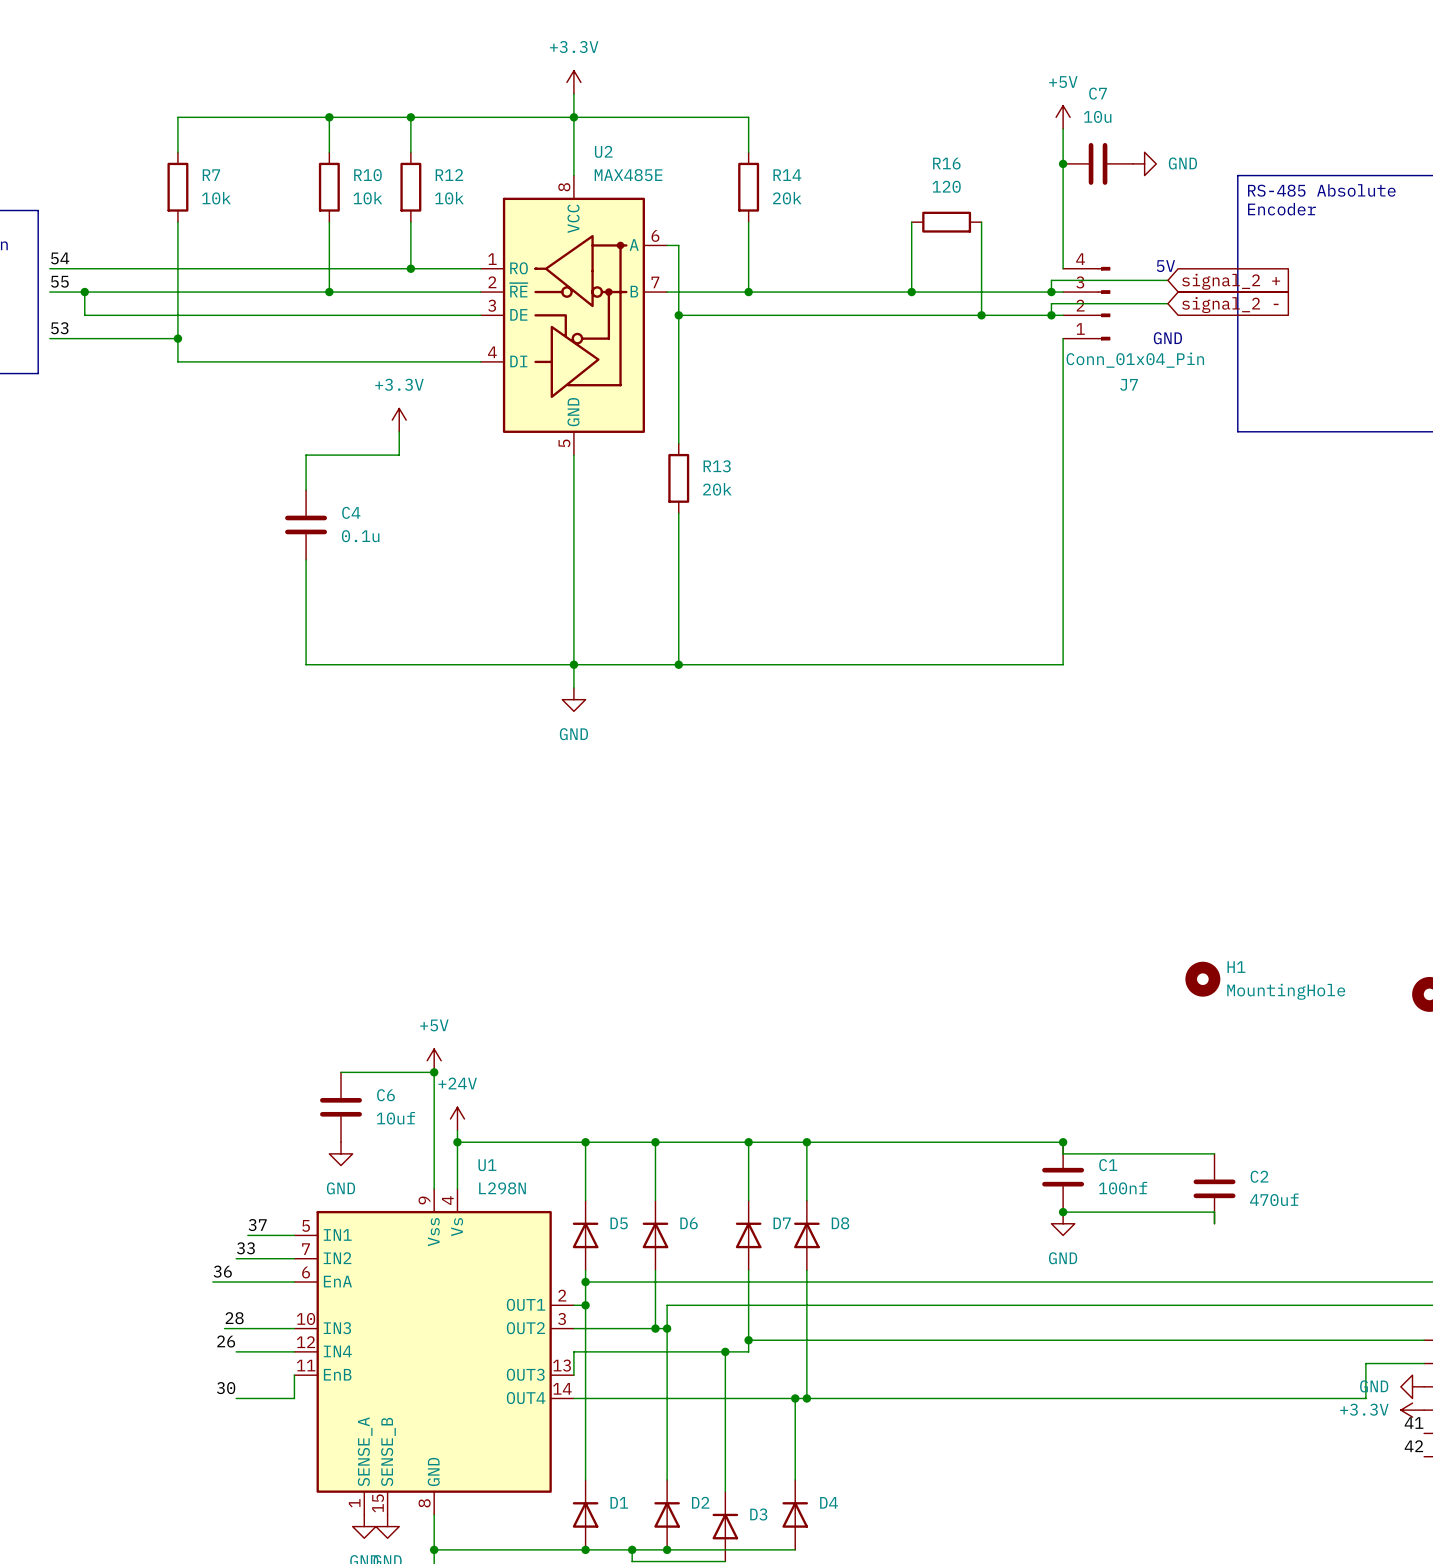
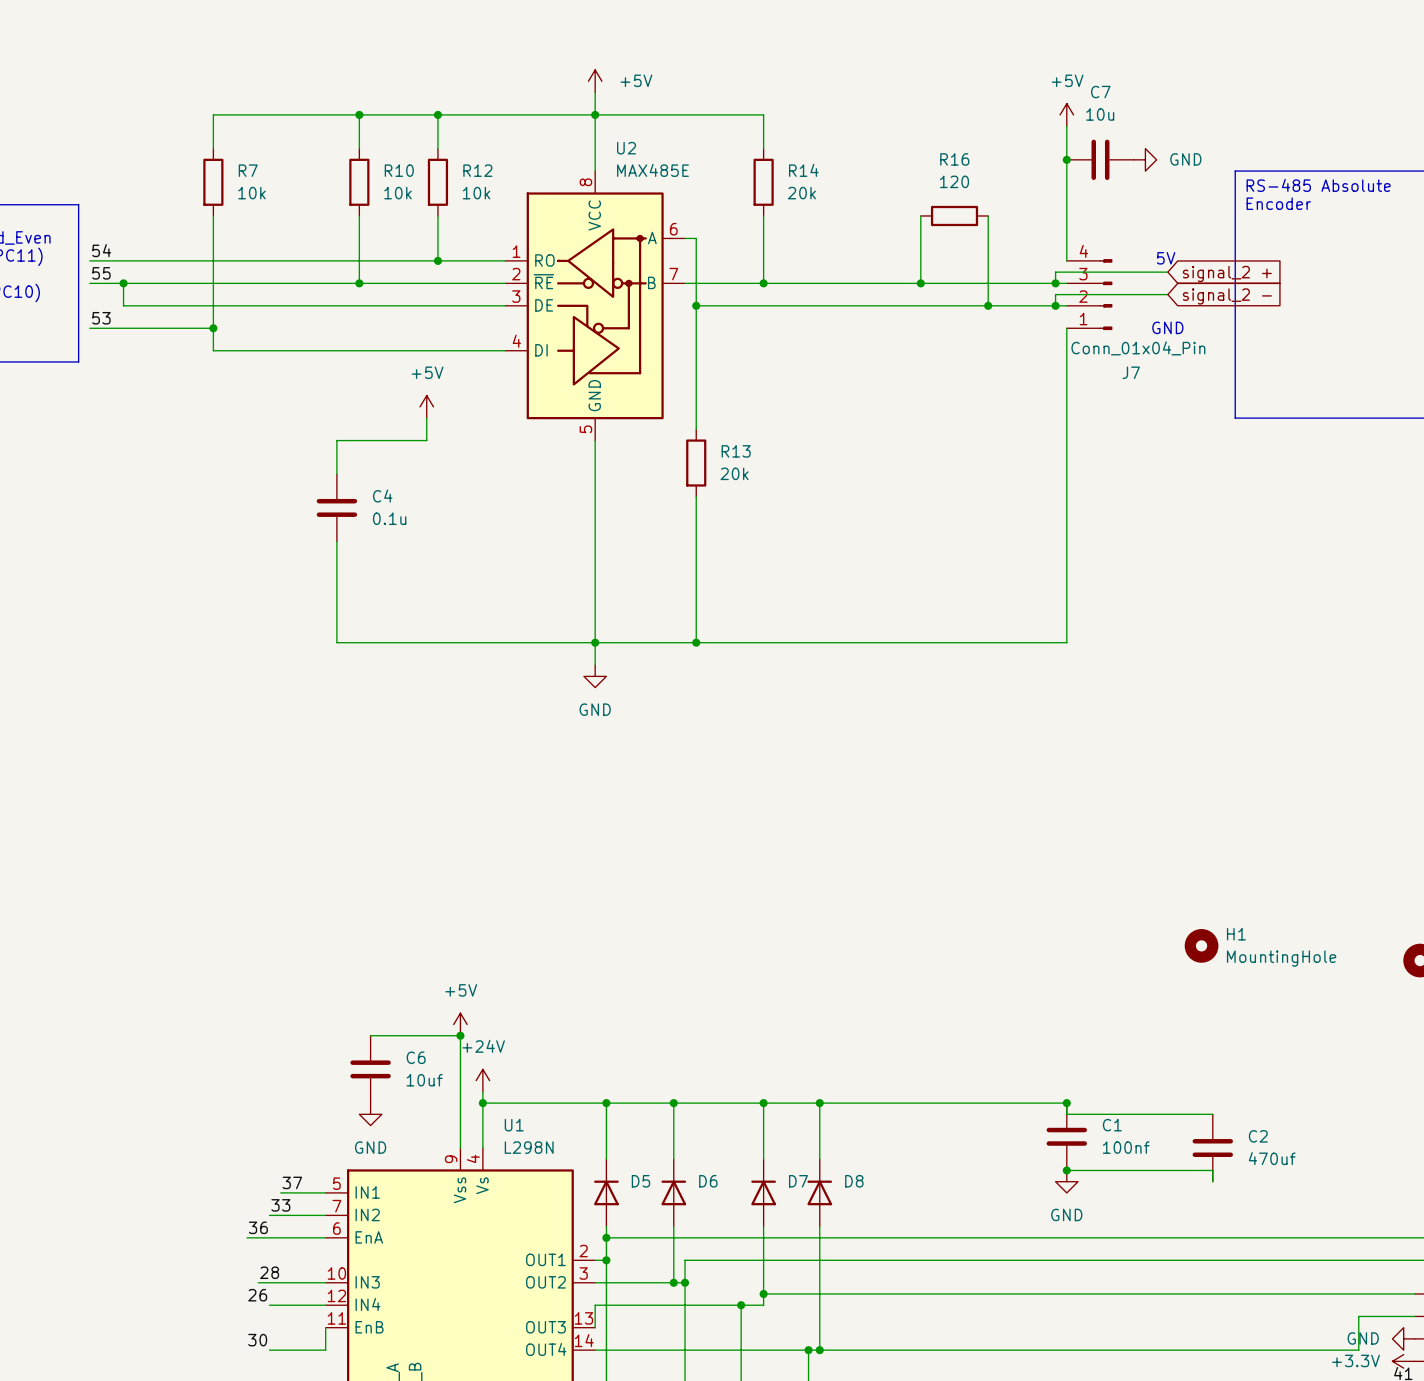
power symbol: +3.3V (573, 82) -> +5V (595, 81)
power symbol: +3.3V (399, 420) -> +5V (426, 406)

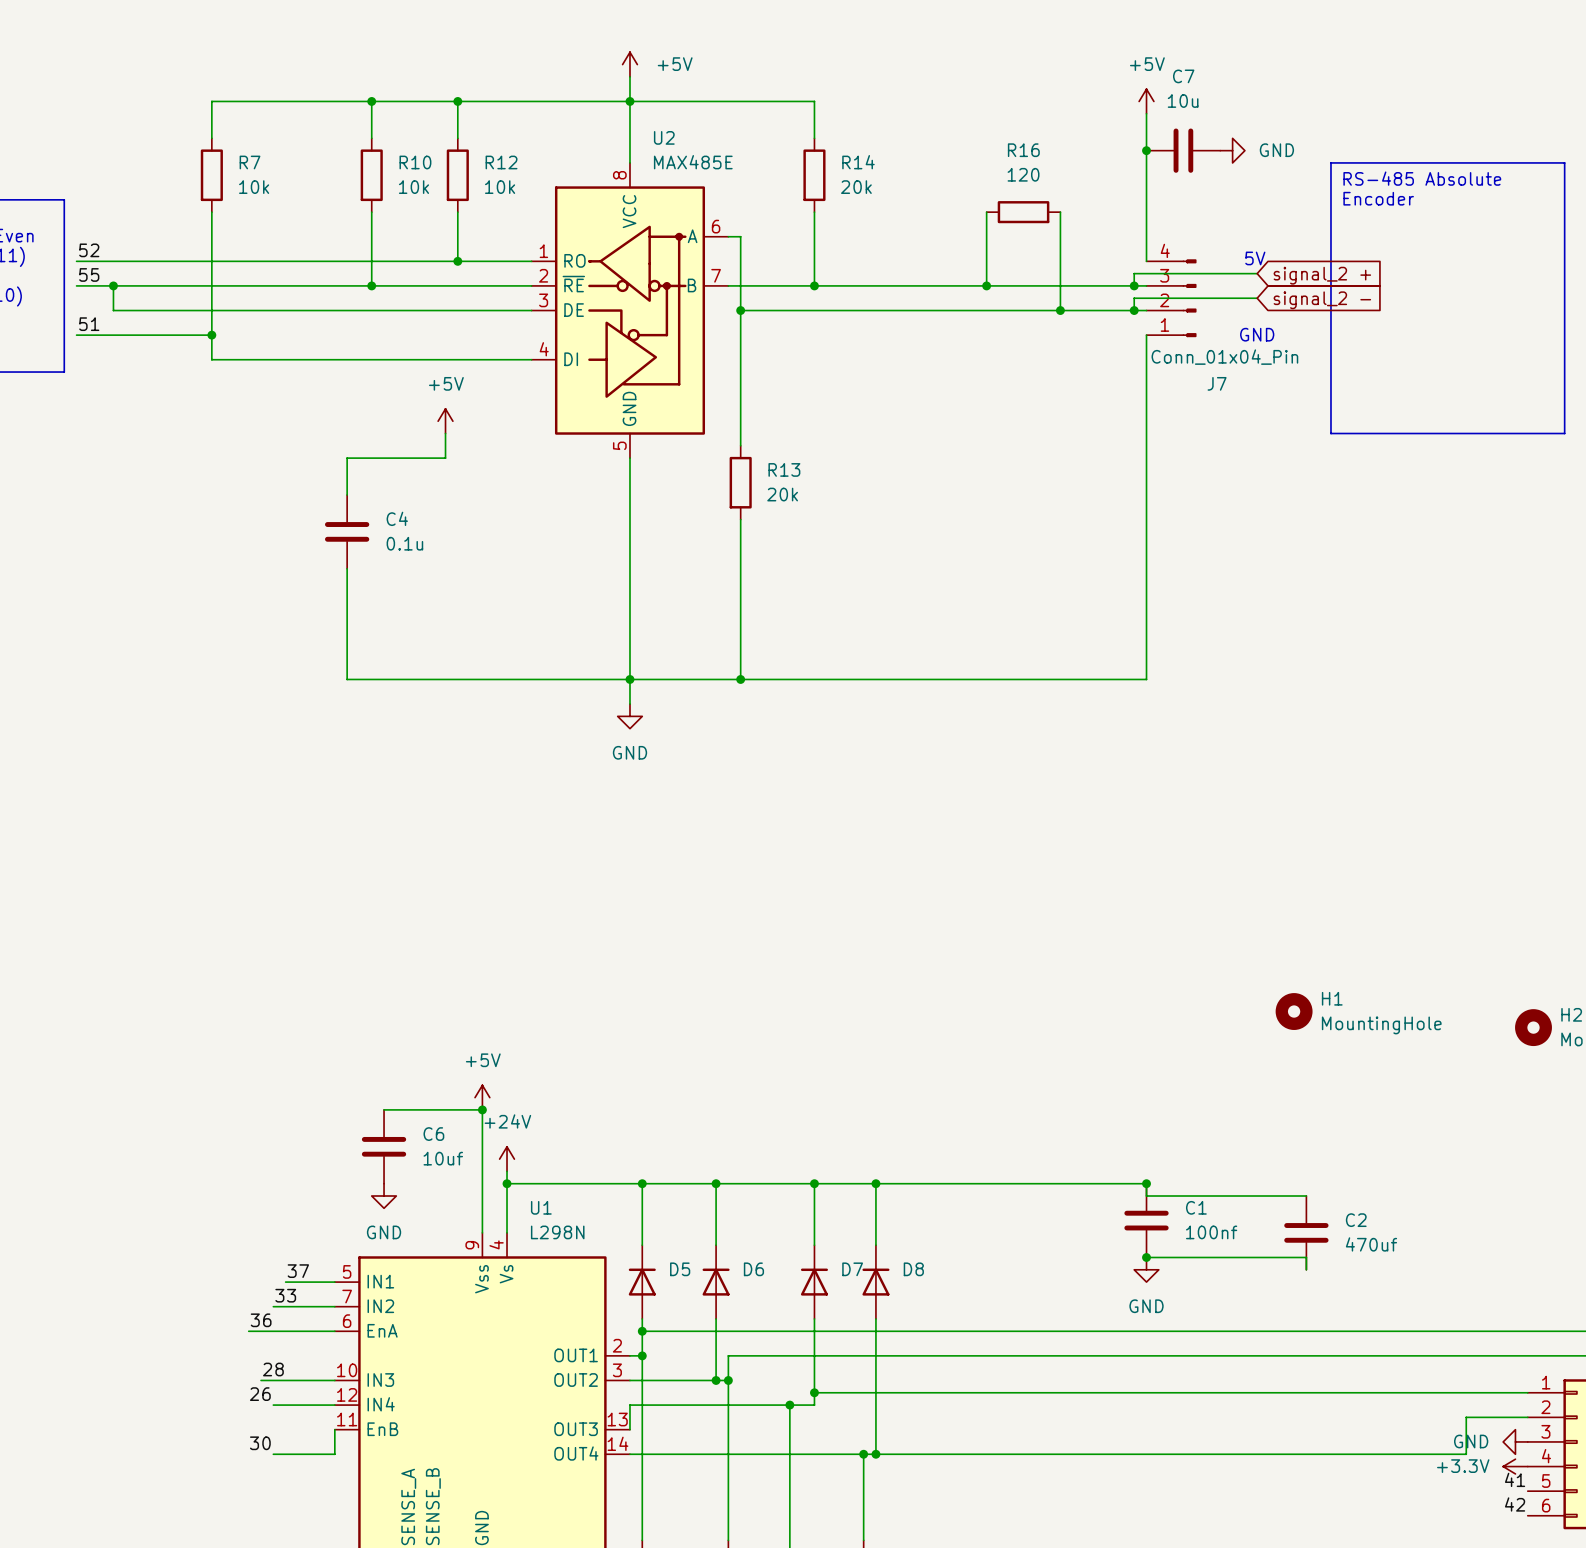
label: 54 (101, 250) -> 52 (89, 250)
label: 53 (101, 318) -> 51 (89, 324)

